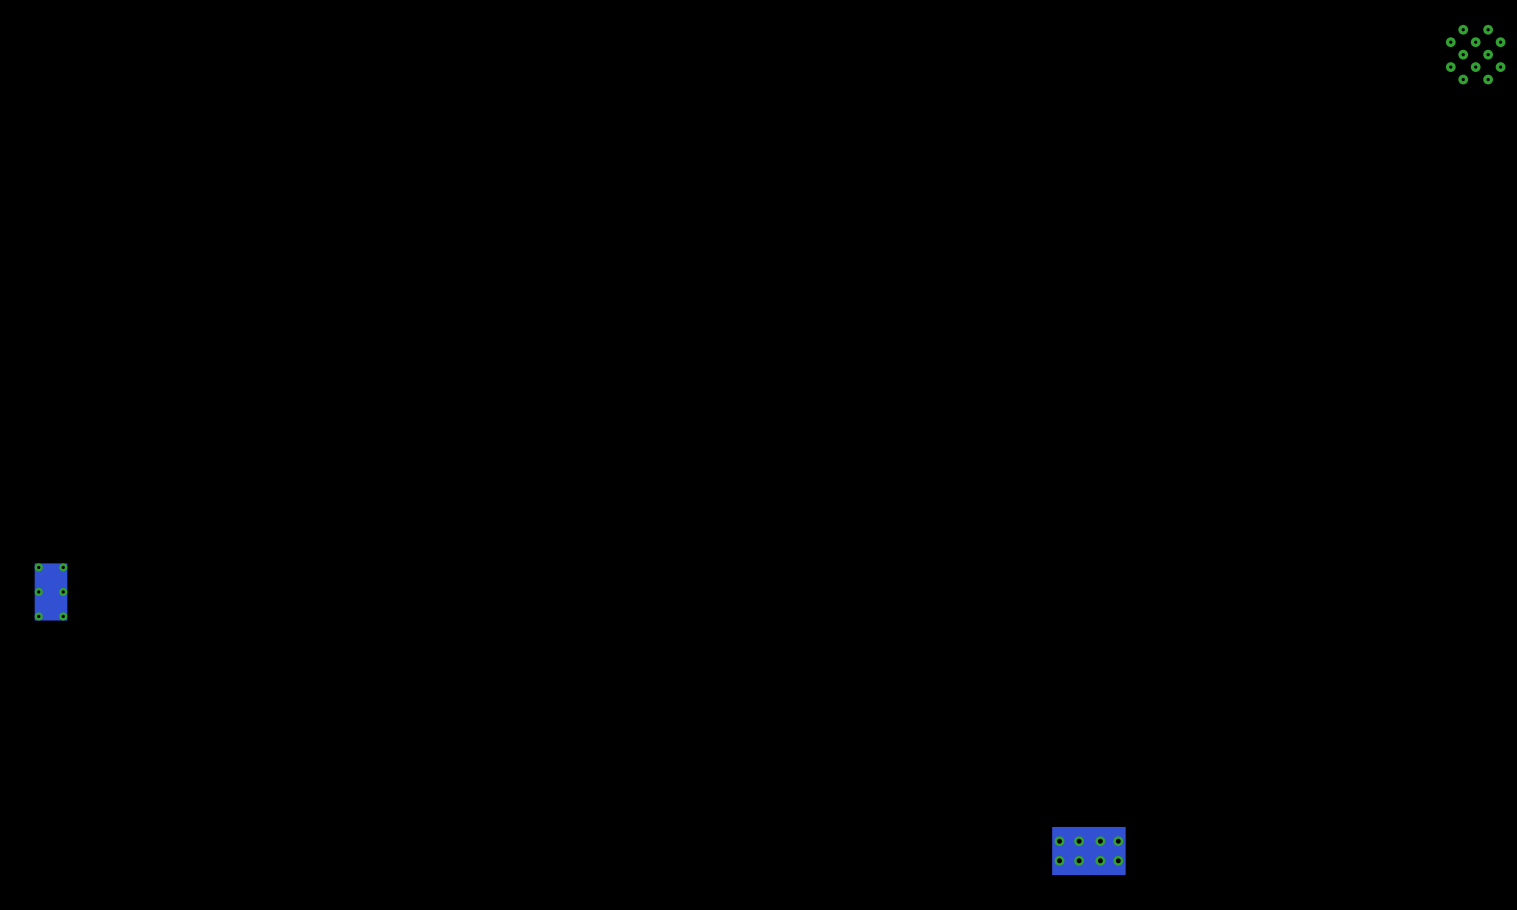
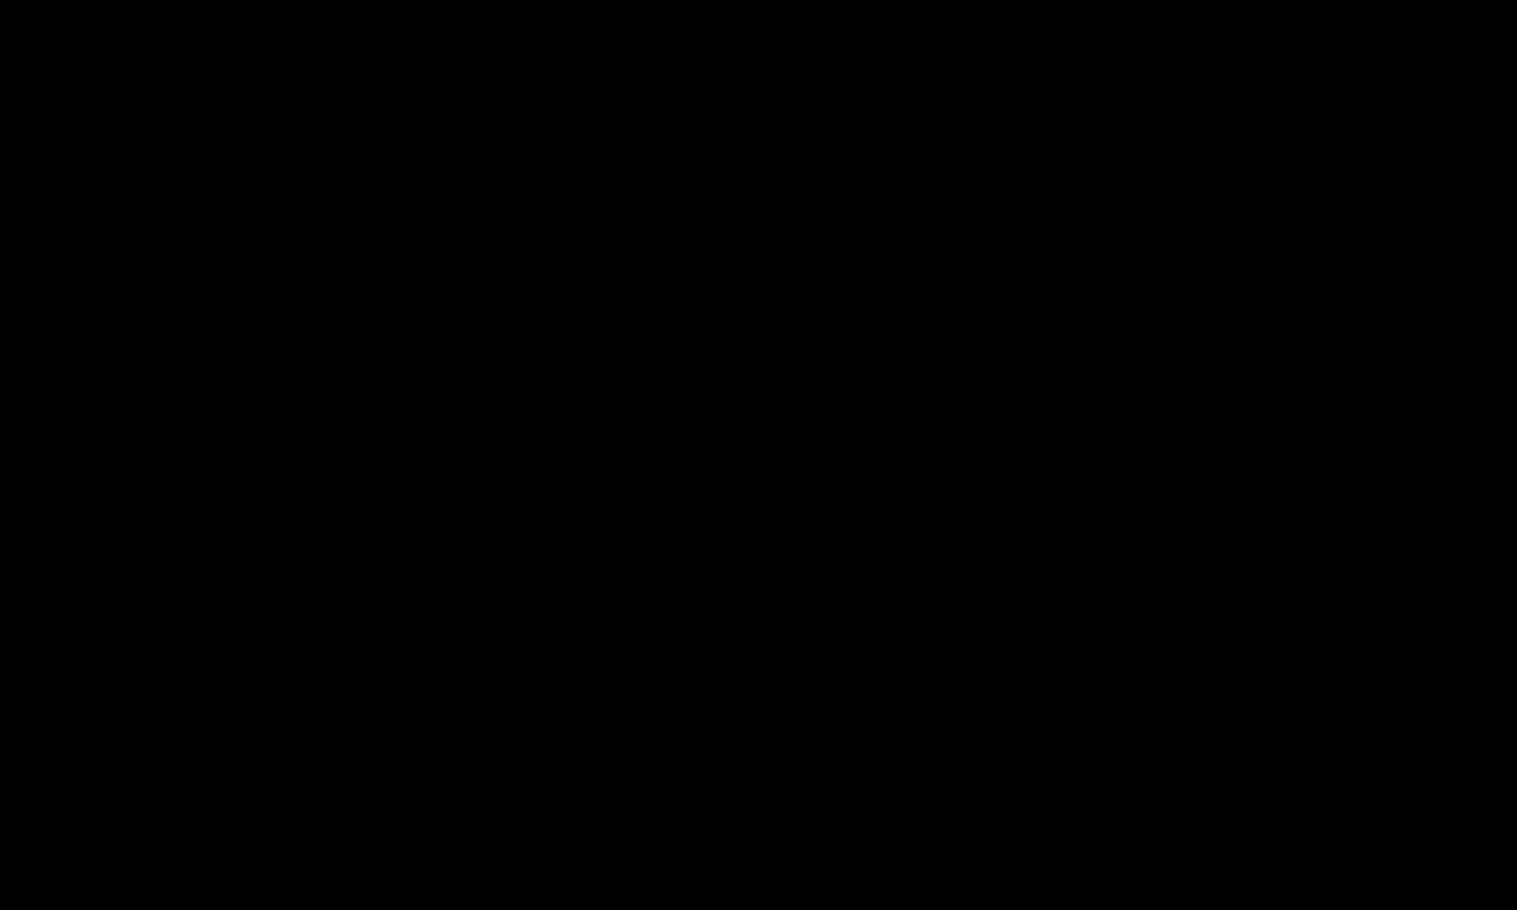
part: (1475, 54) -> none
part: (51, 591) -> none
part: (1088, 851) -> none

